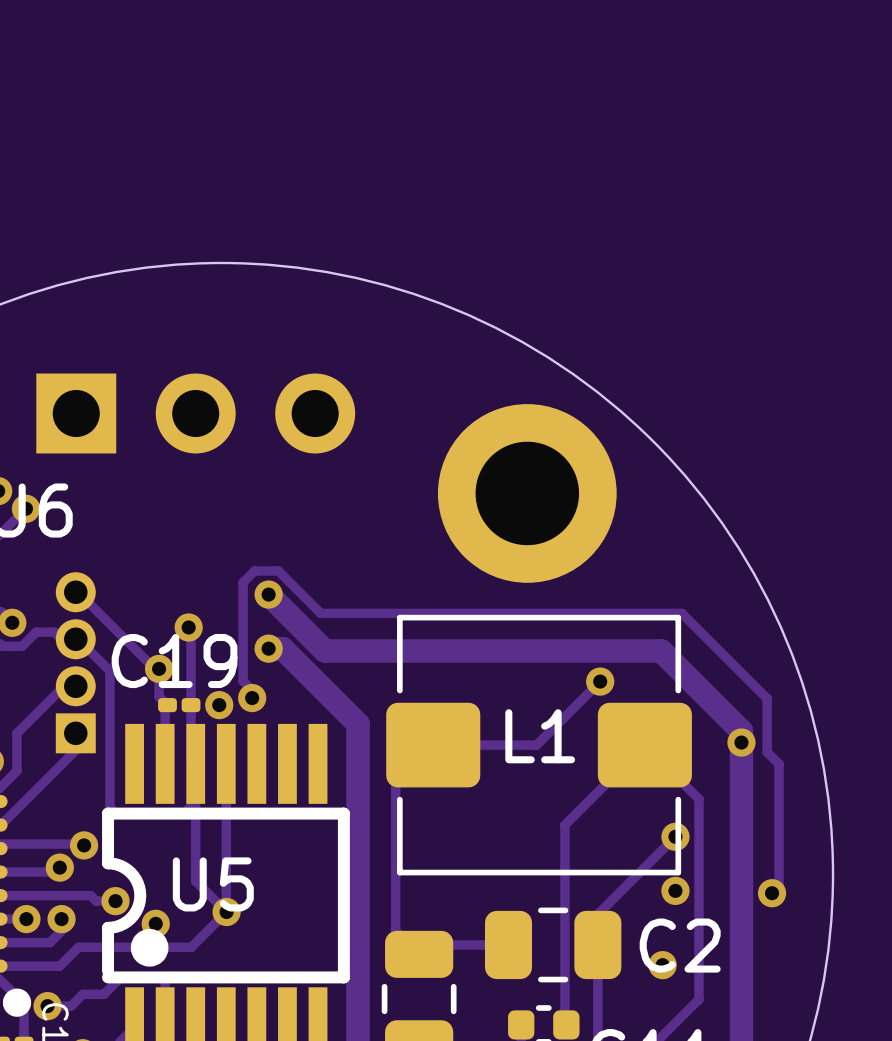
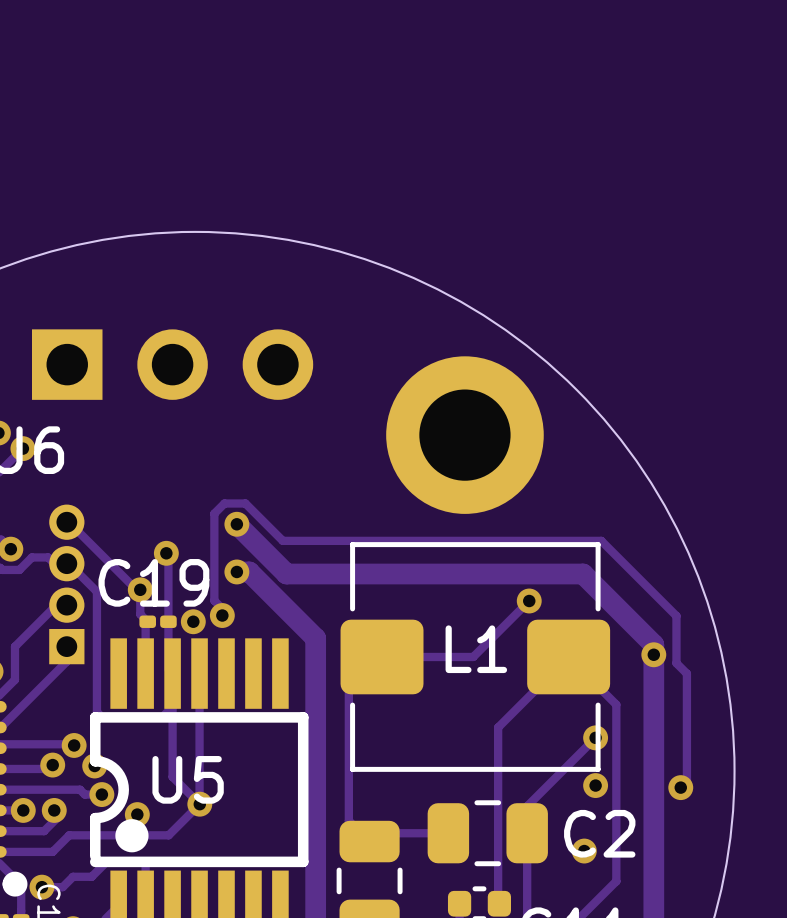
via: none -> (94, 766)

